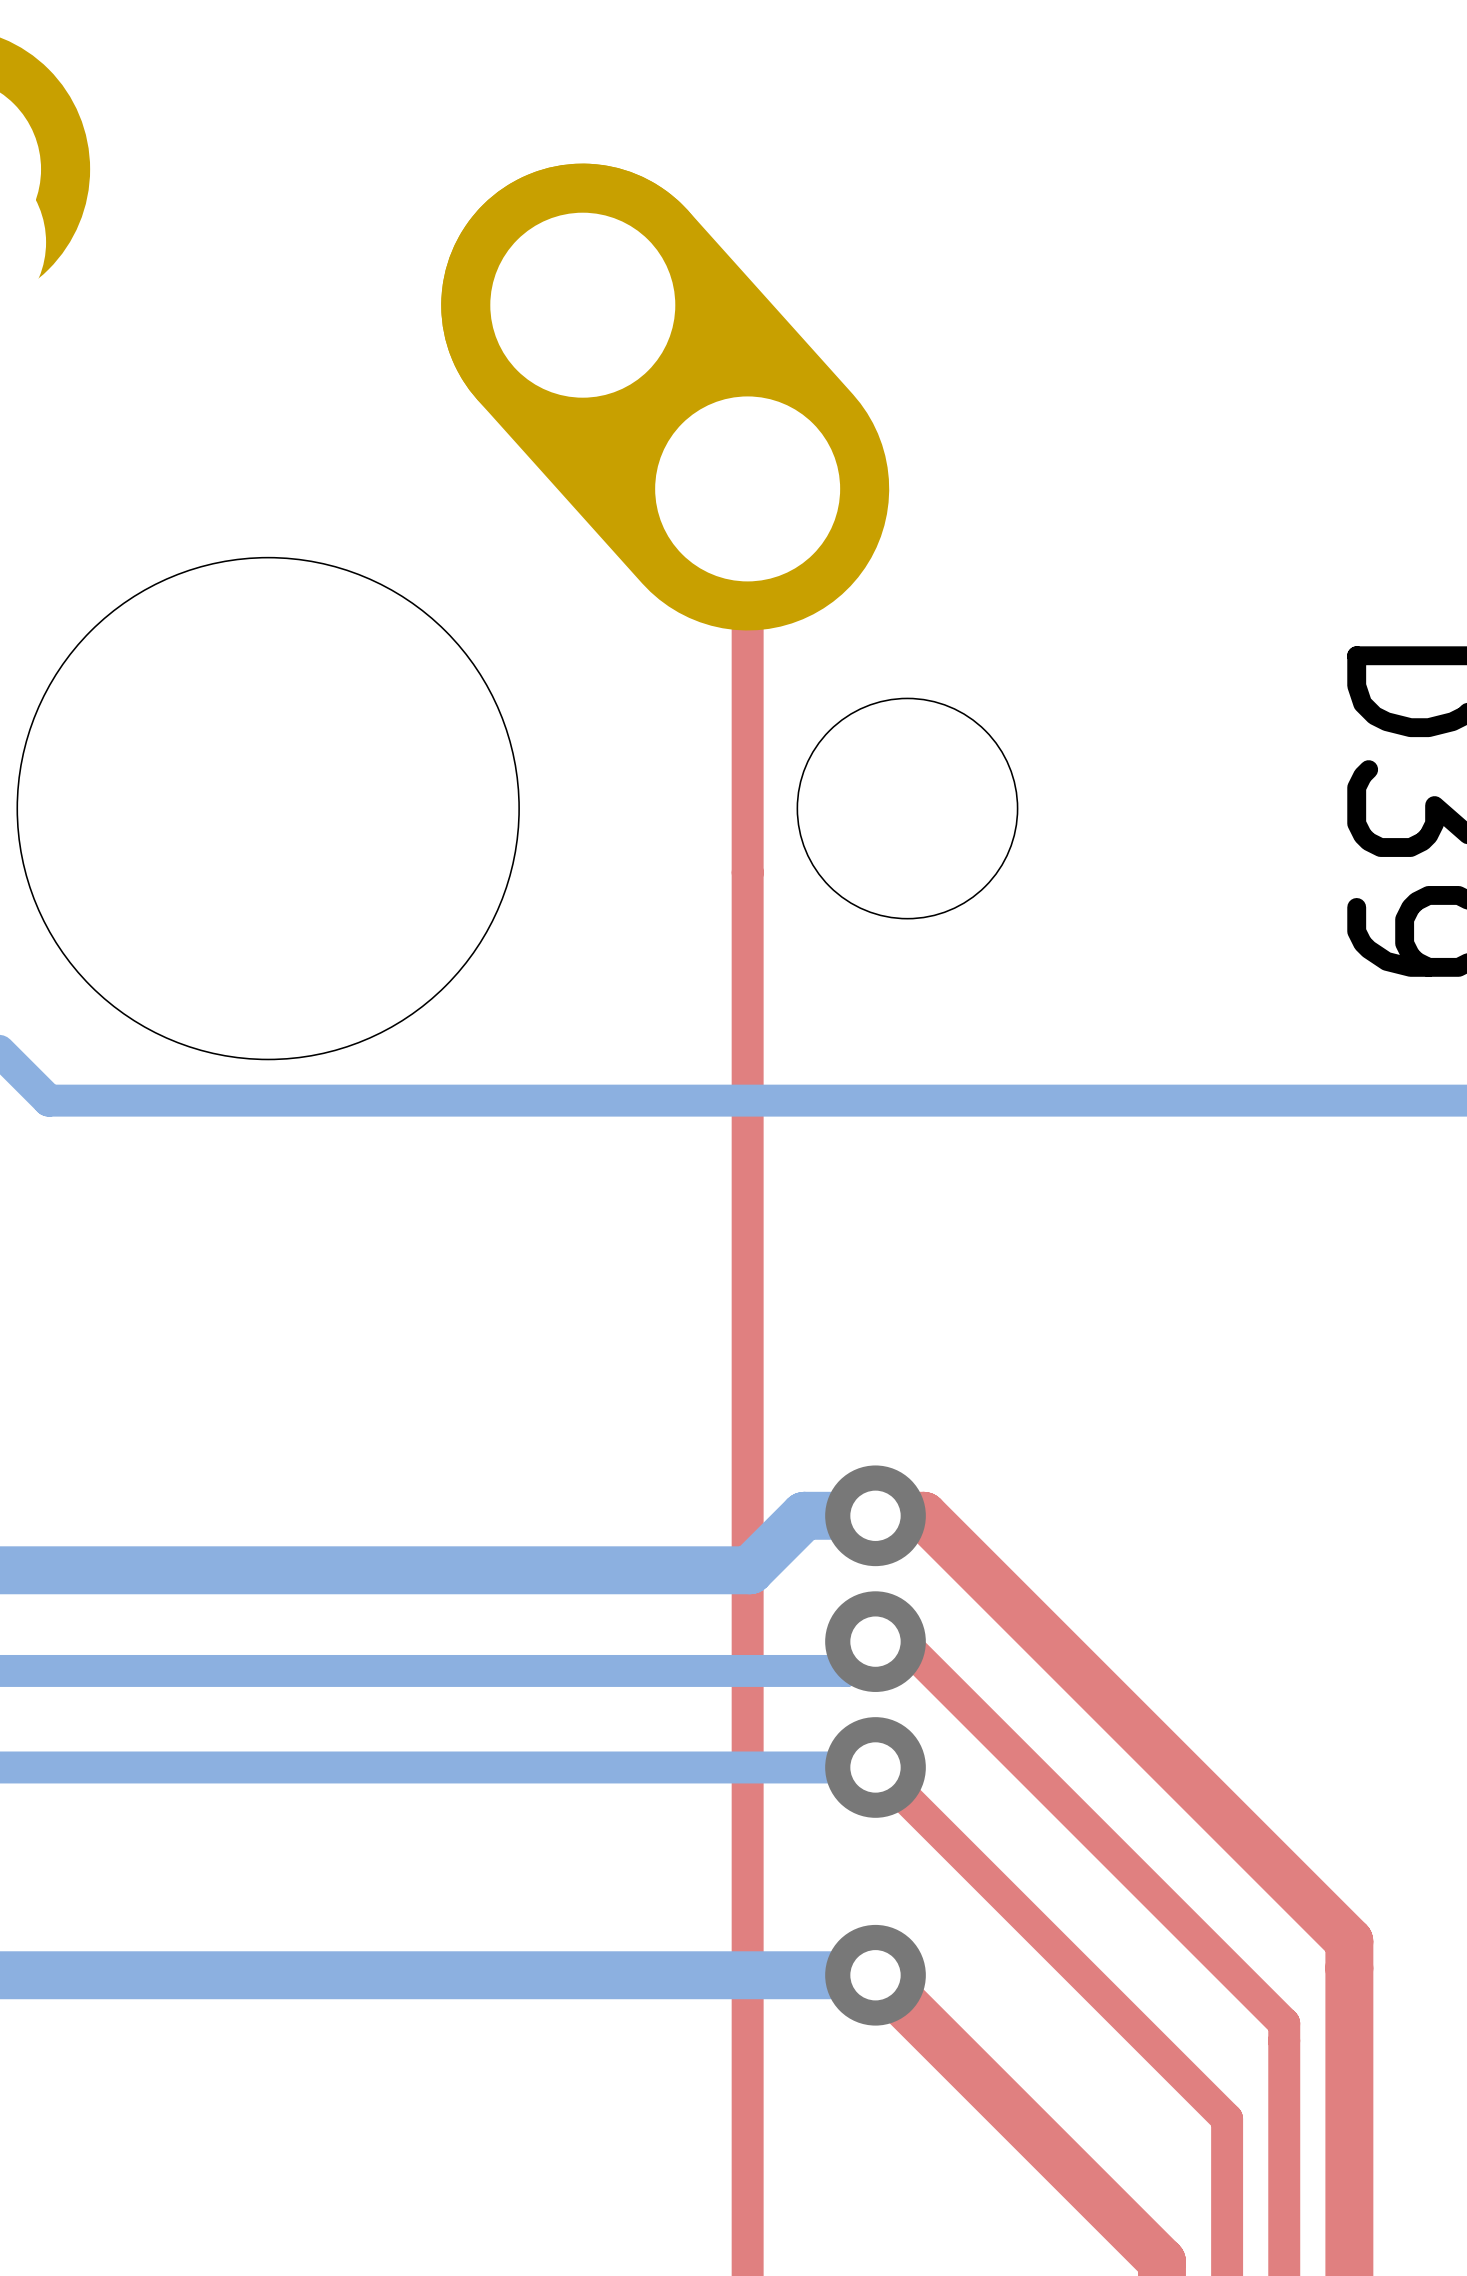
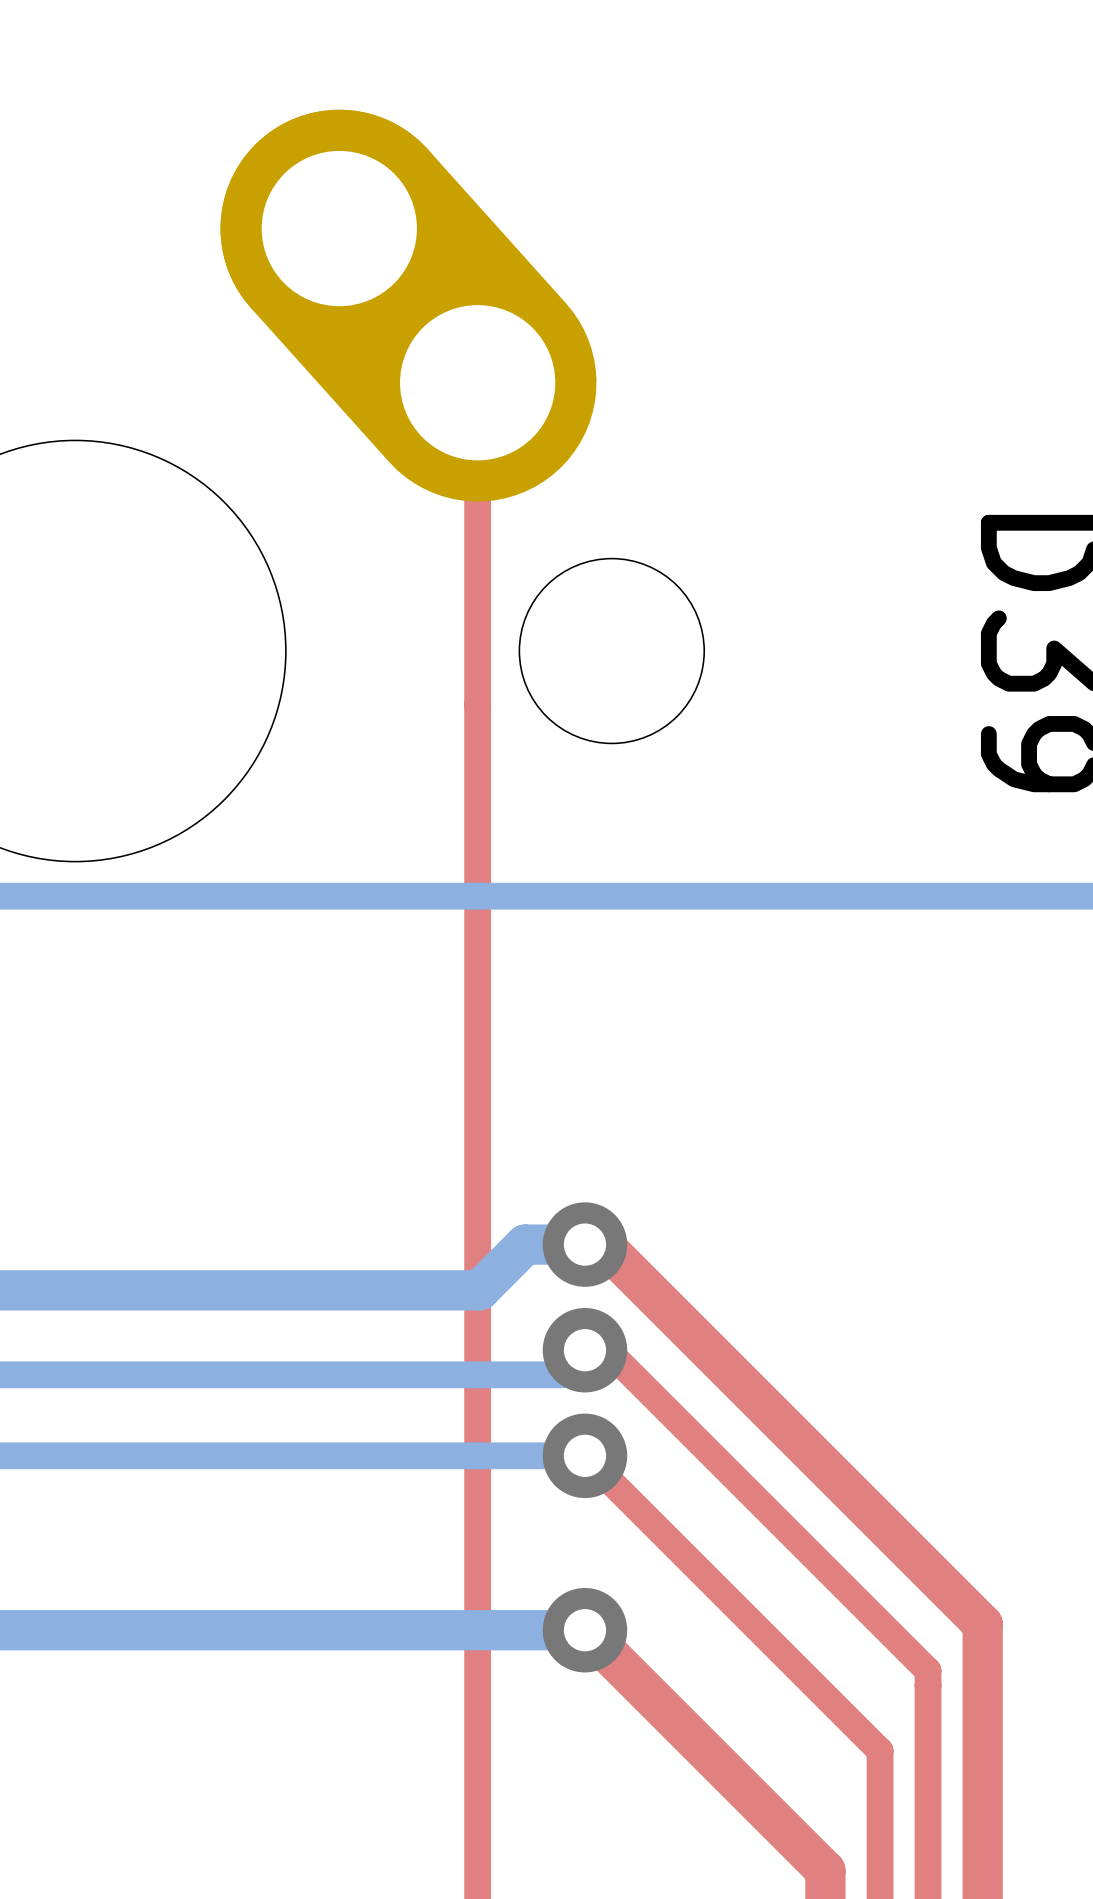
top track: (896, 1515) (923, 1515) (1349, 1941) (1349, 1968) -> (602, 1244) (982, 1624)

